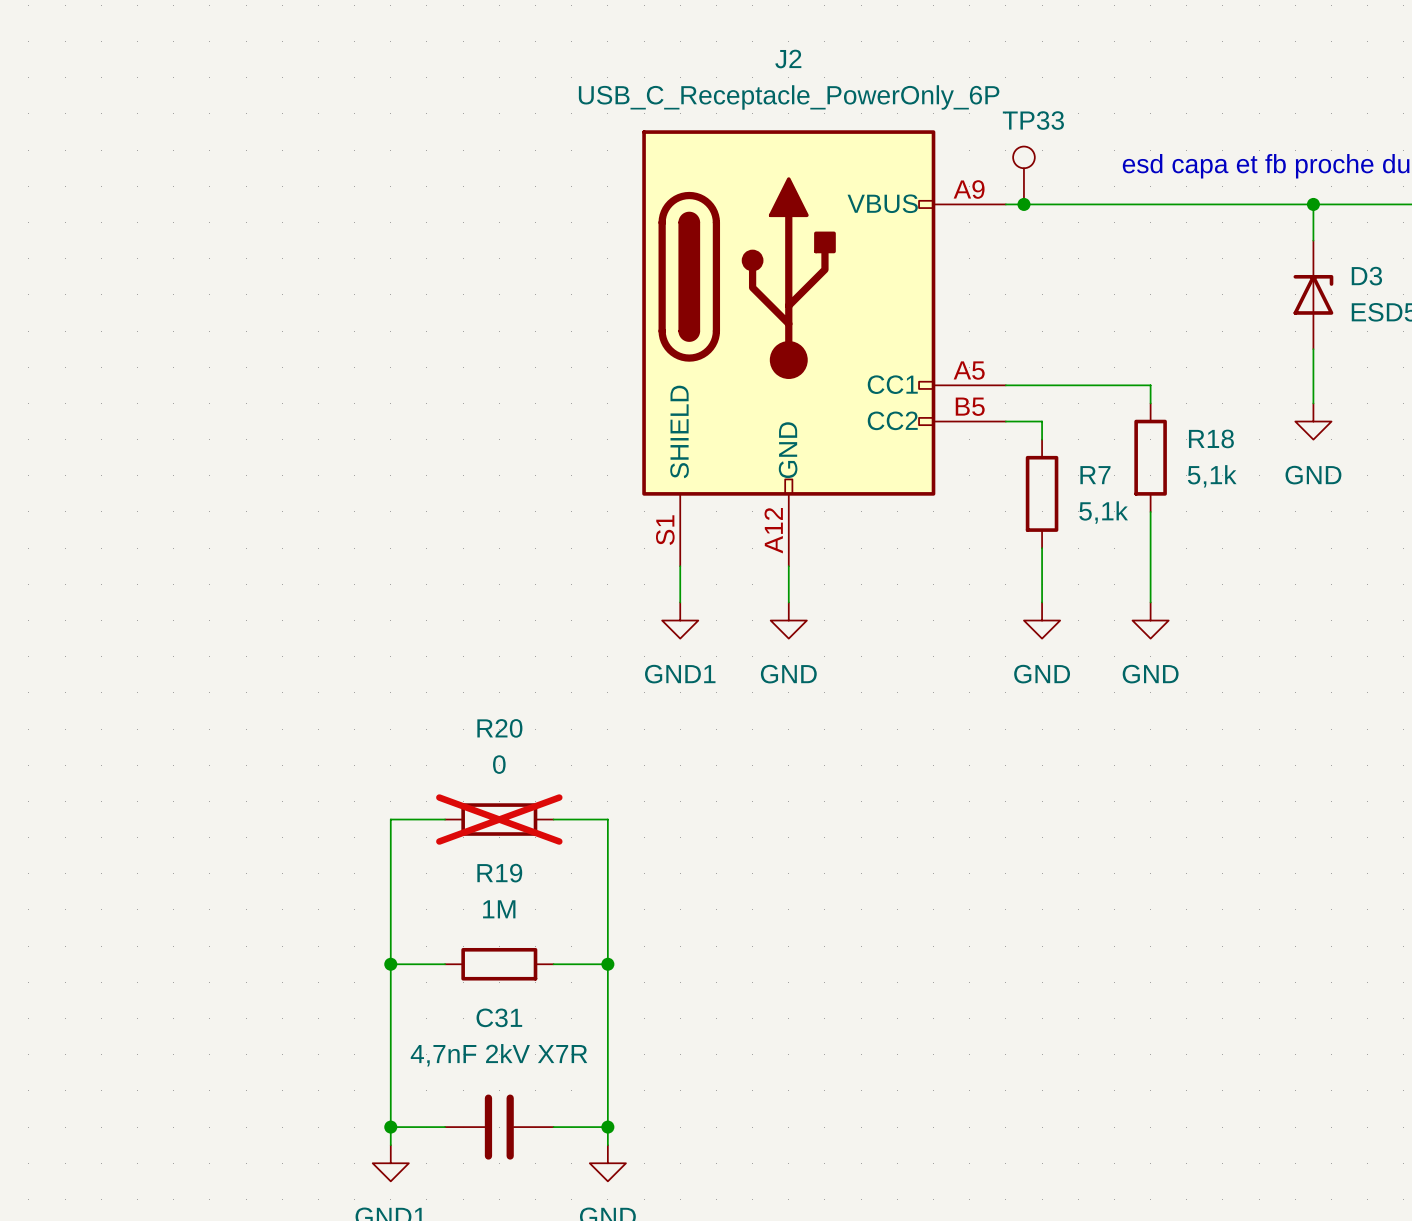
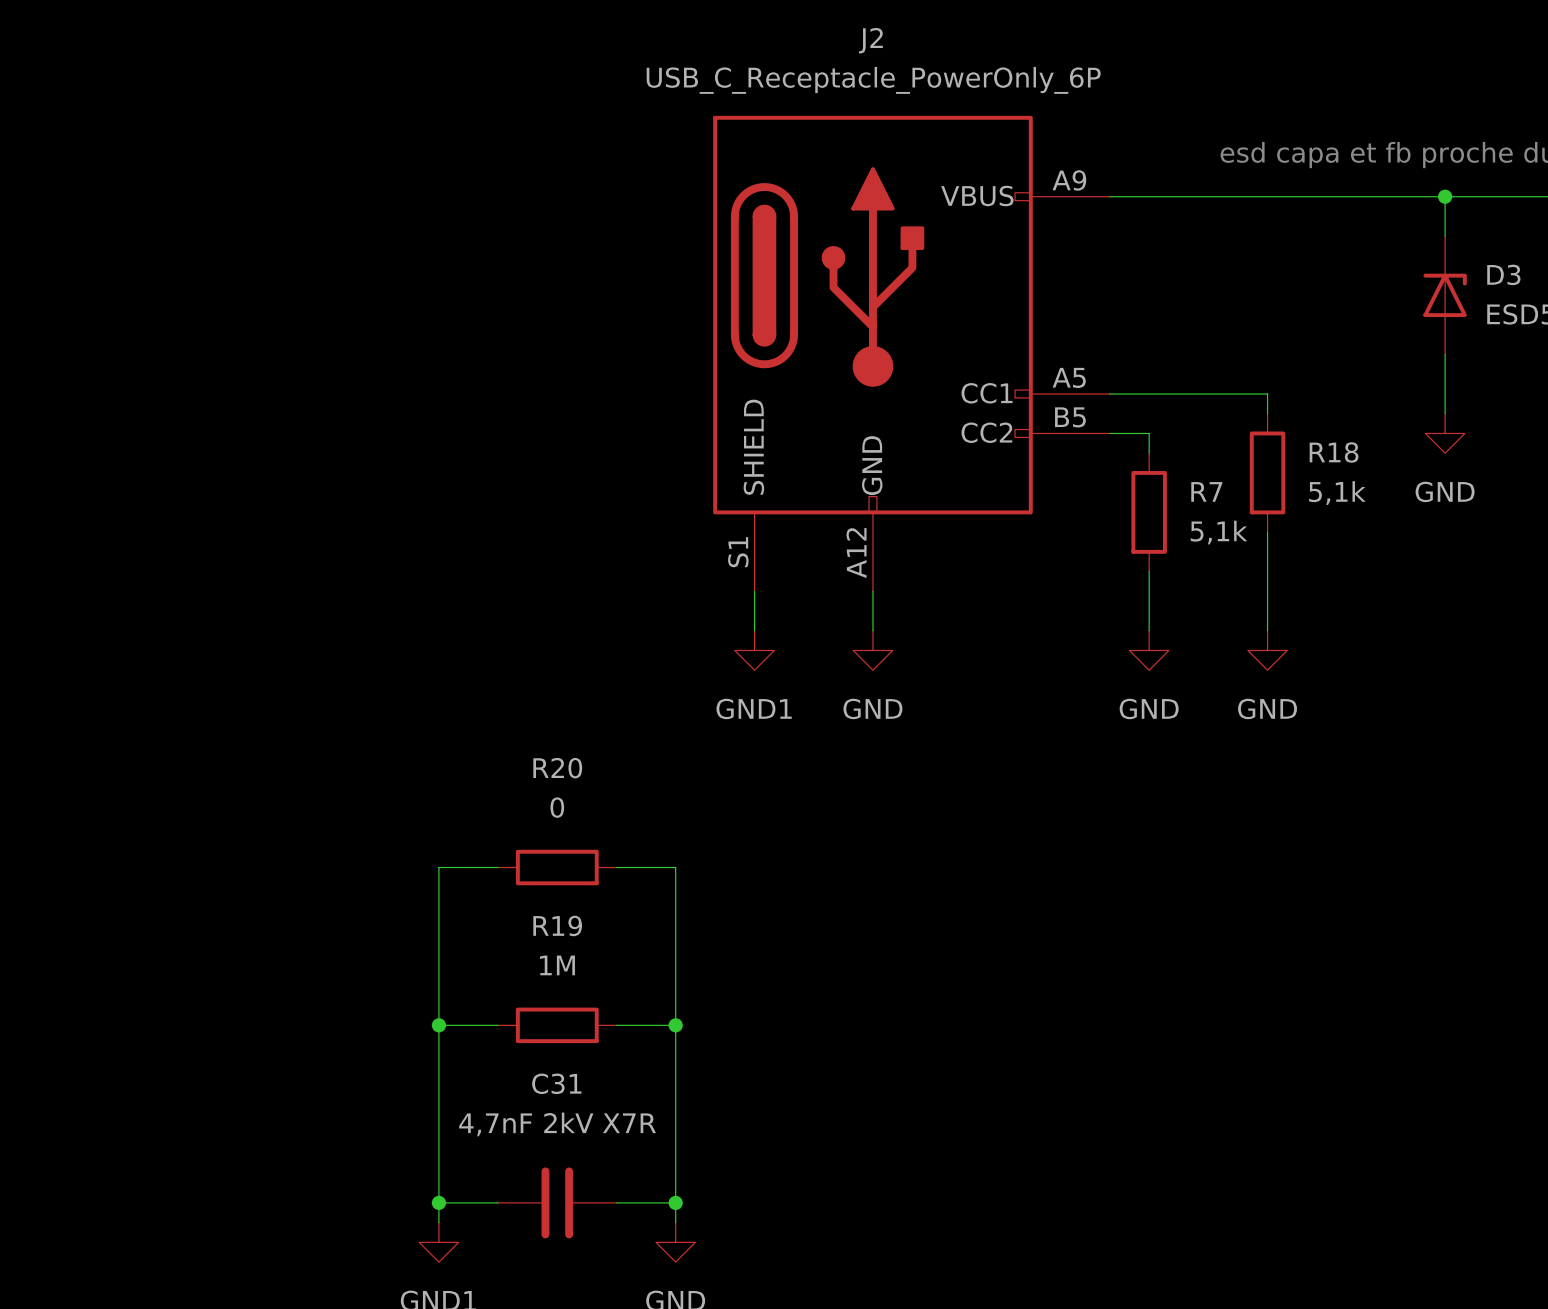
TP33: (1023, 175) -> none
junction: (1023, 204) -> none
R20 do-not-place cross: (499, 819) -> none

